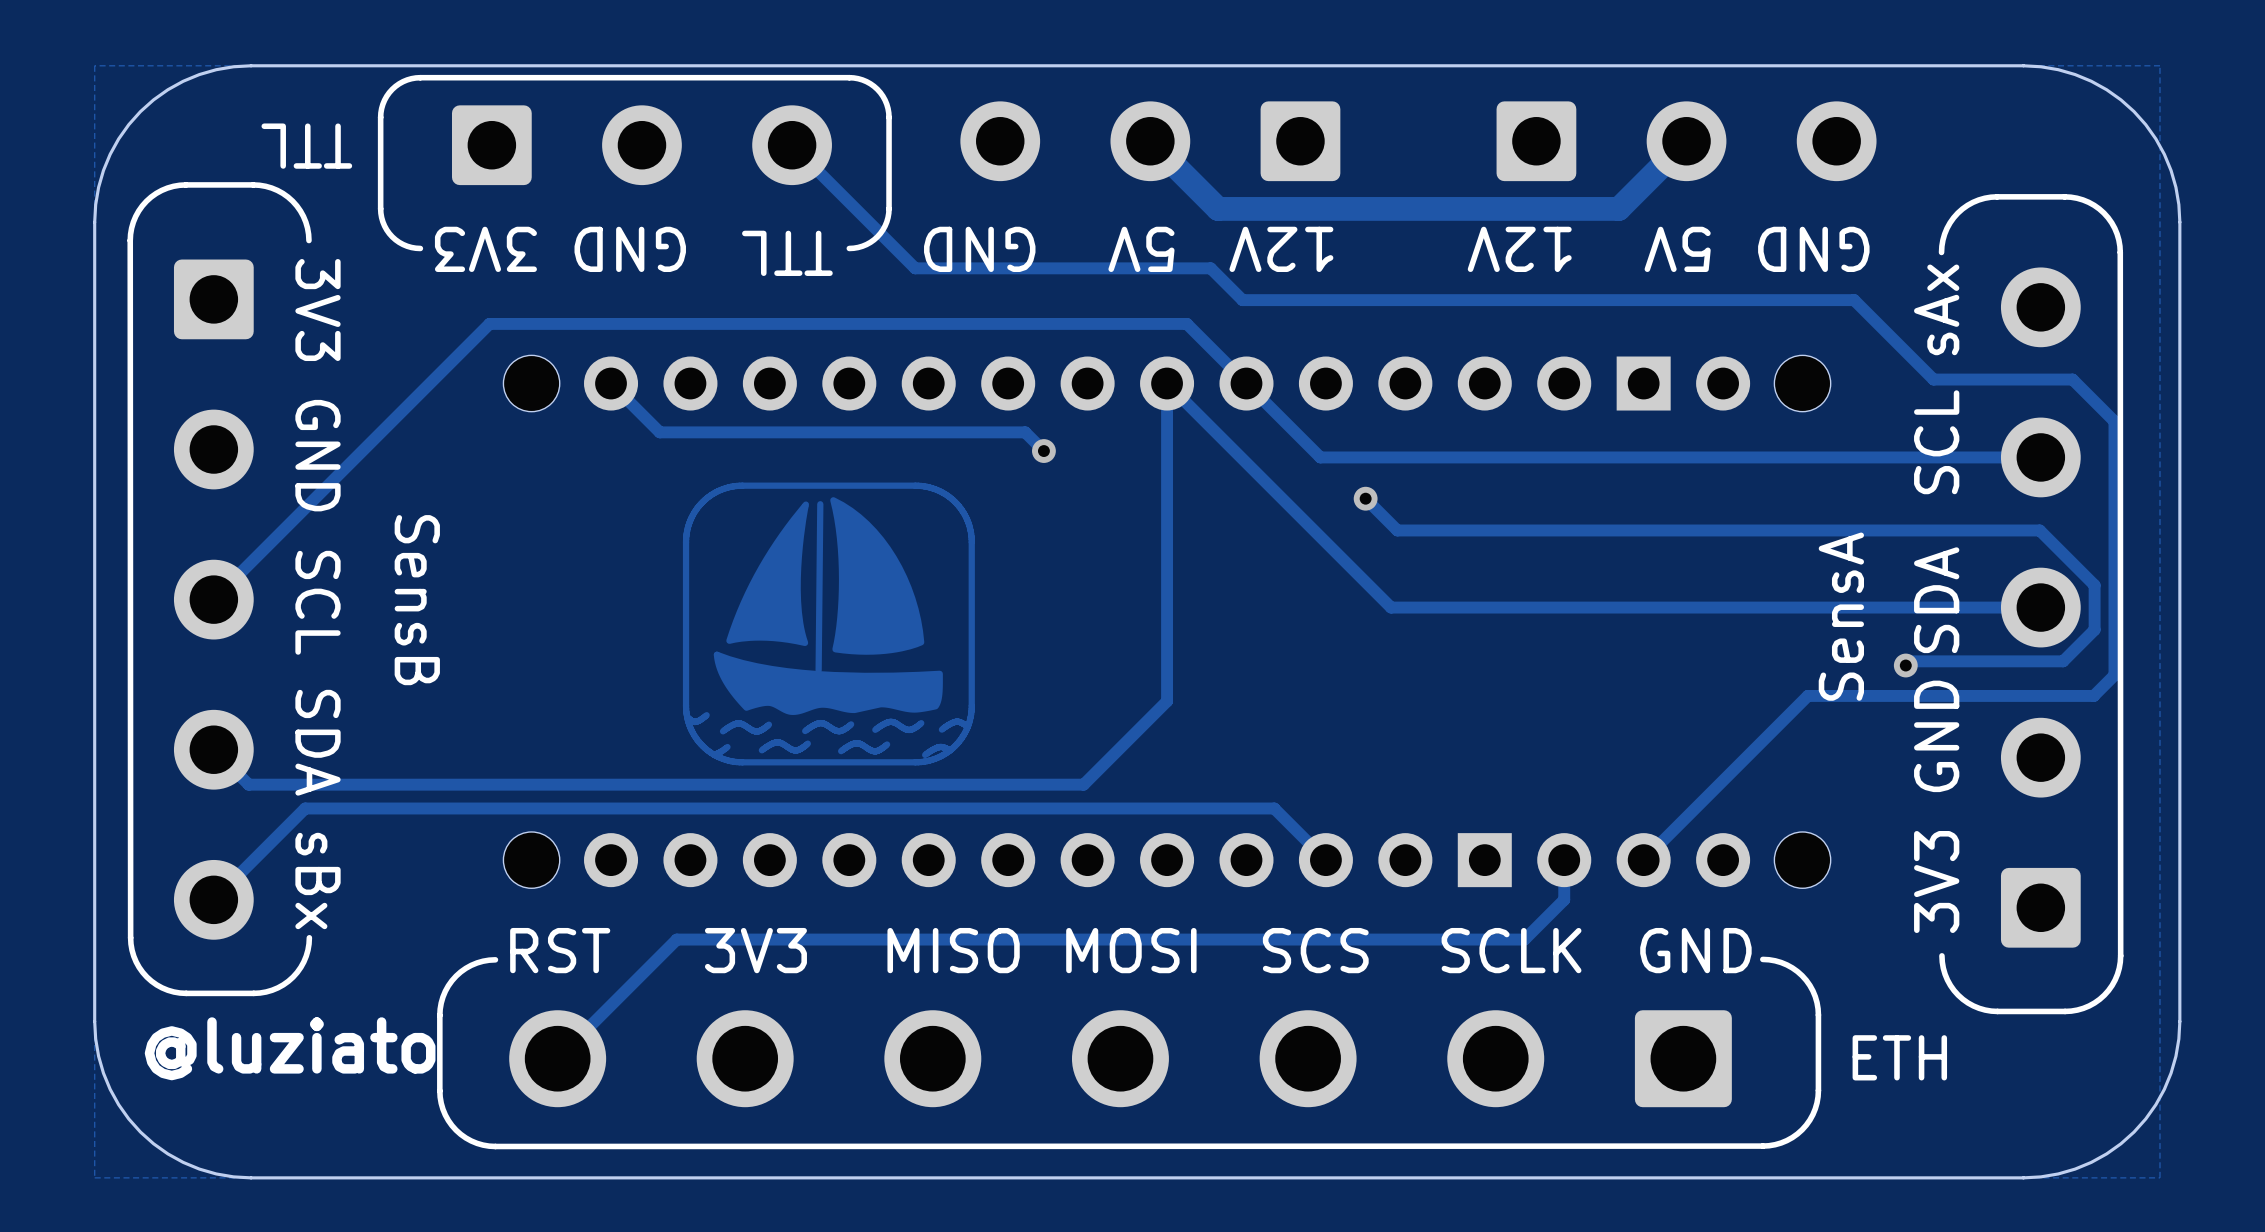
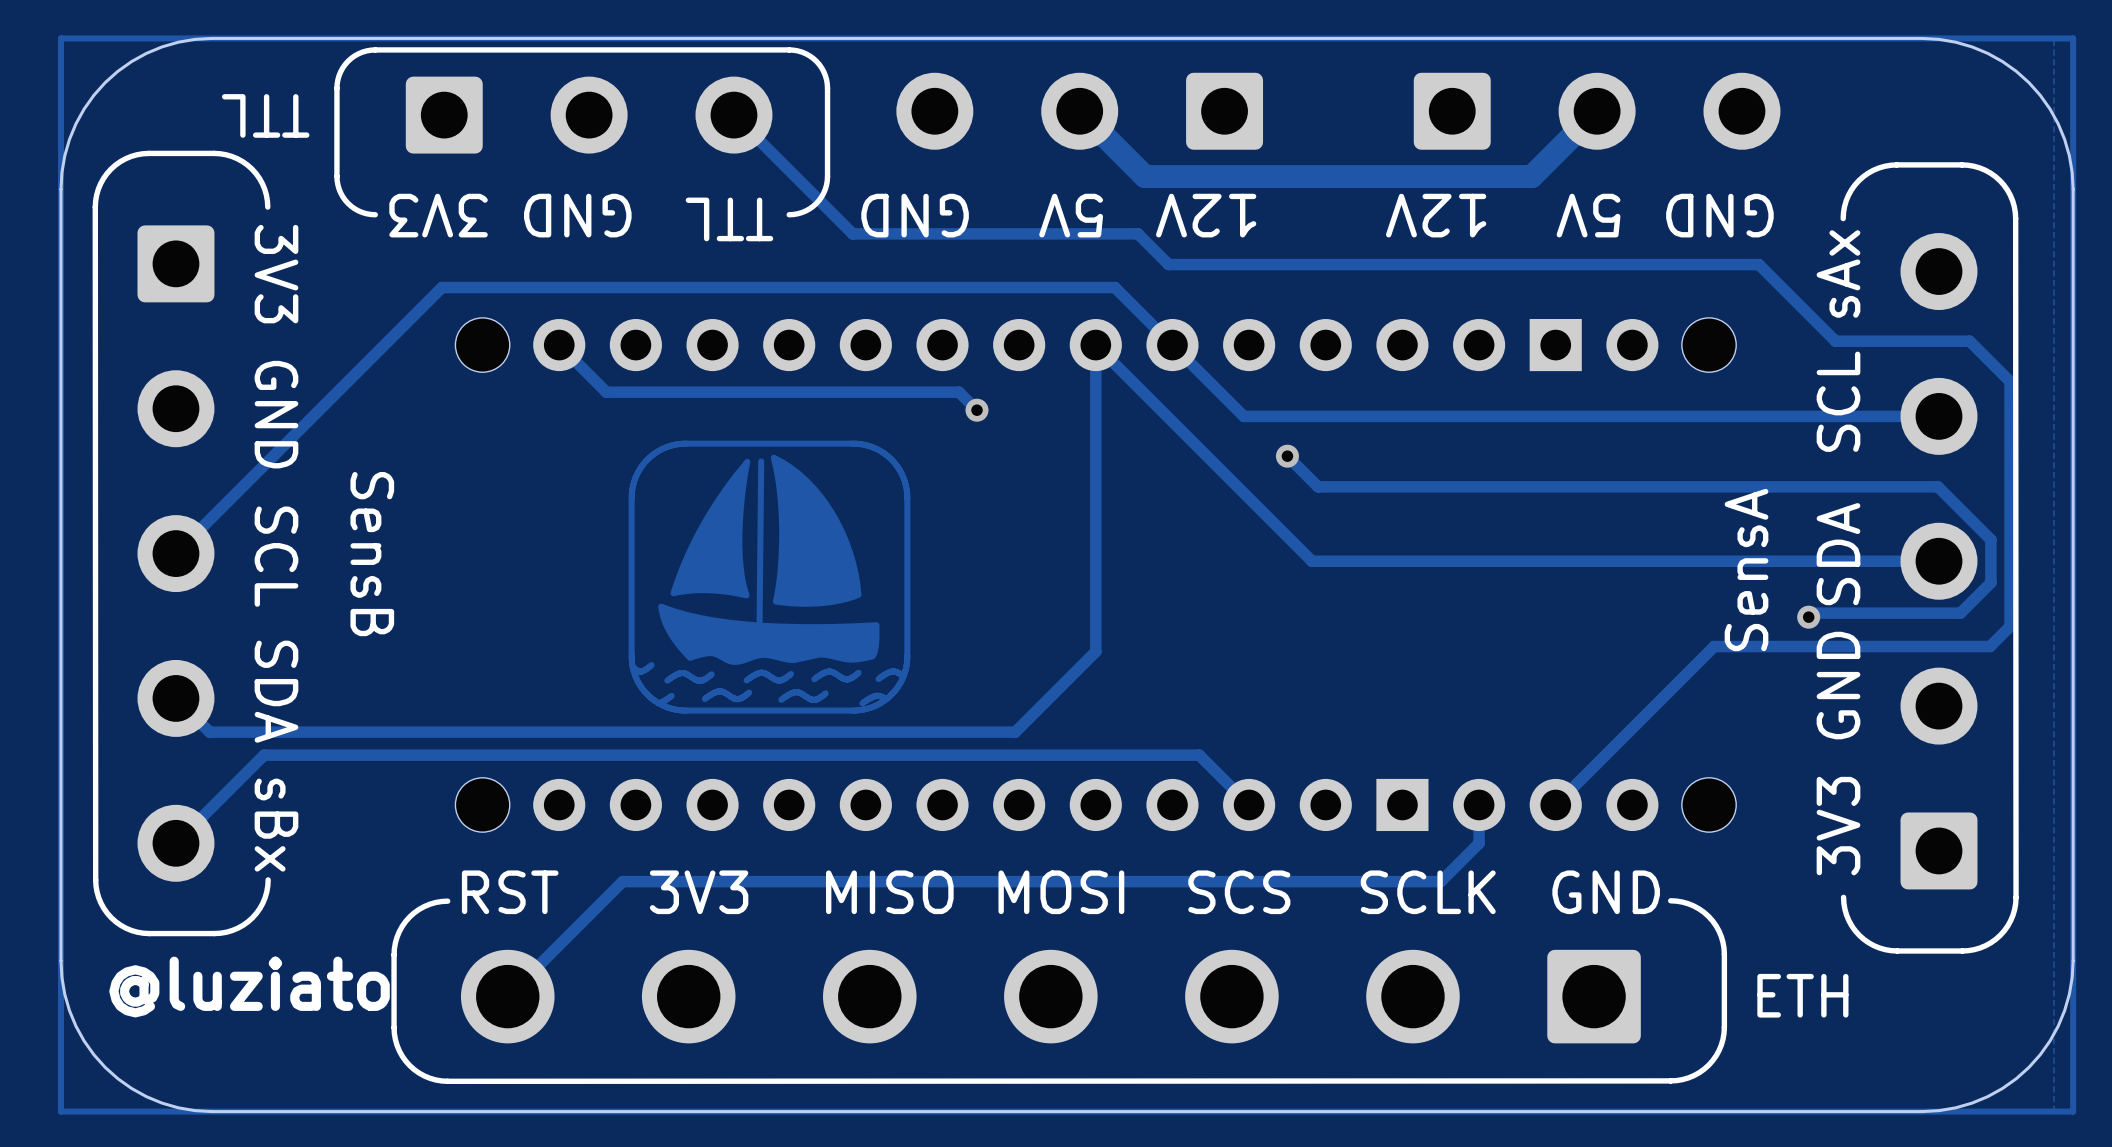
track: none -> (2073, 38) (60, 38) (60, 1111) (2073, 1111) (2073, 38)

